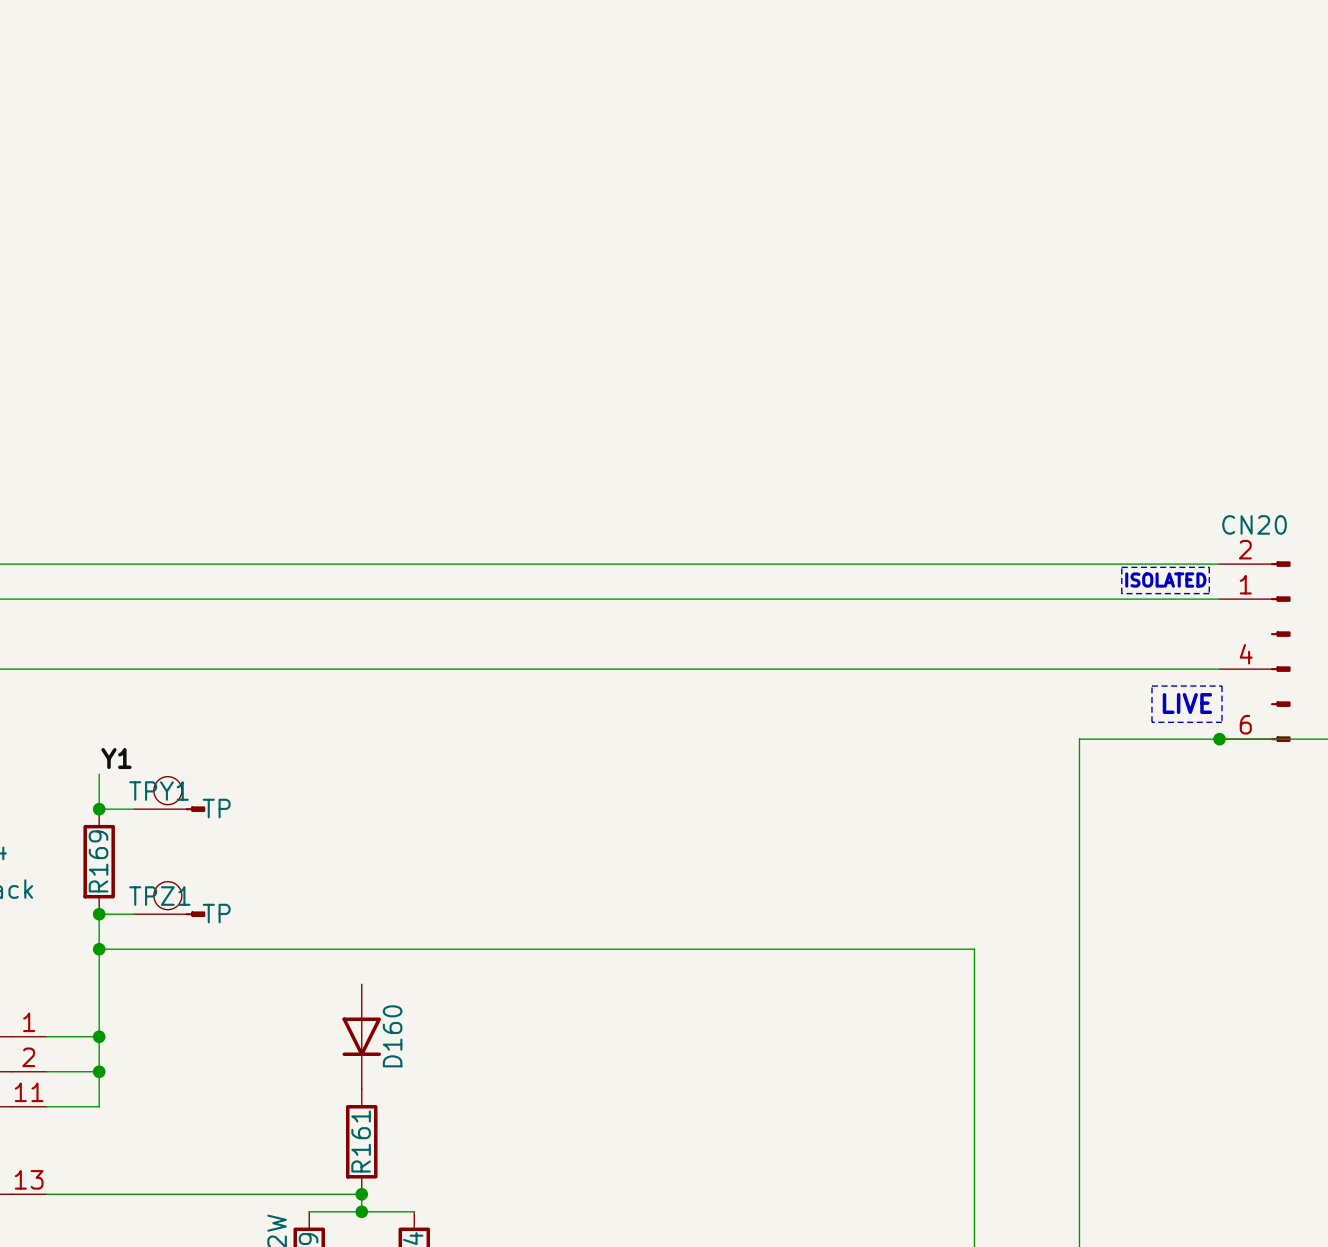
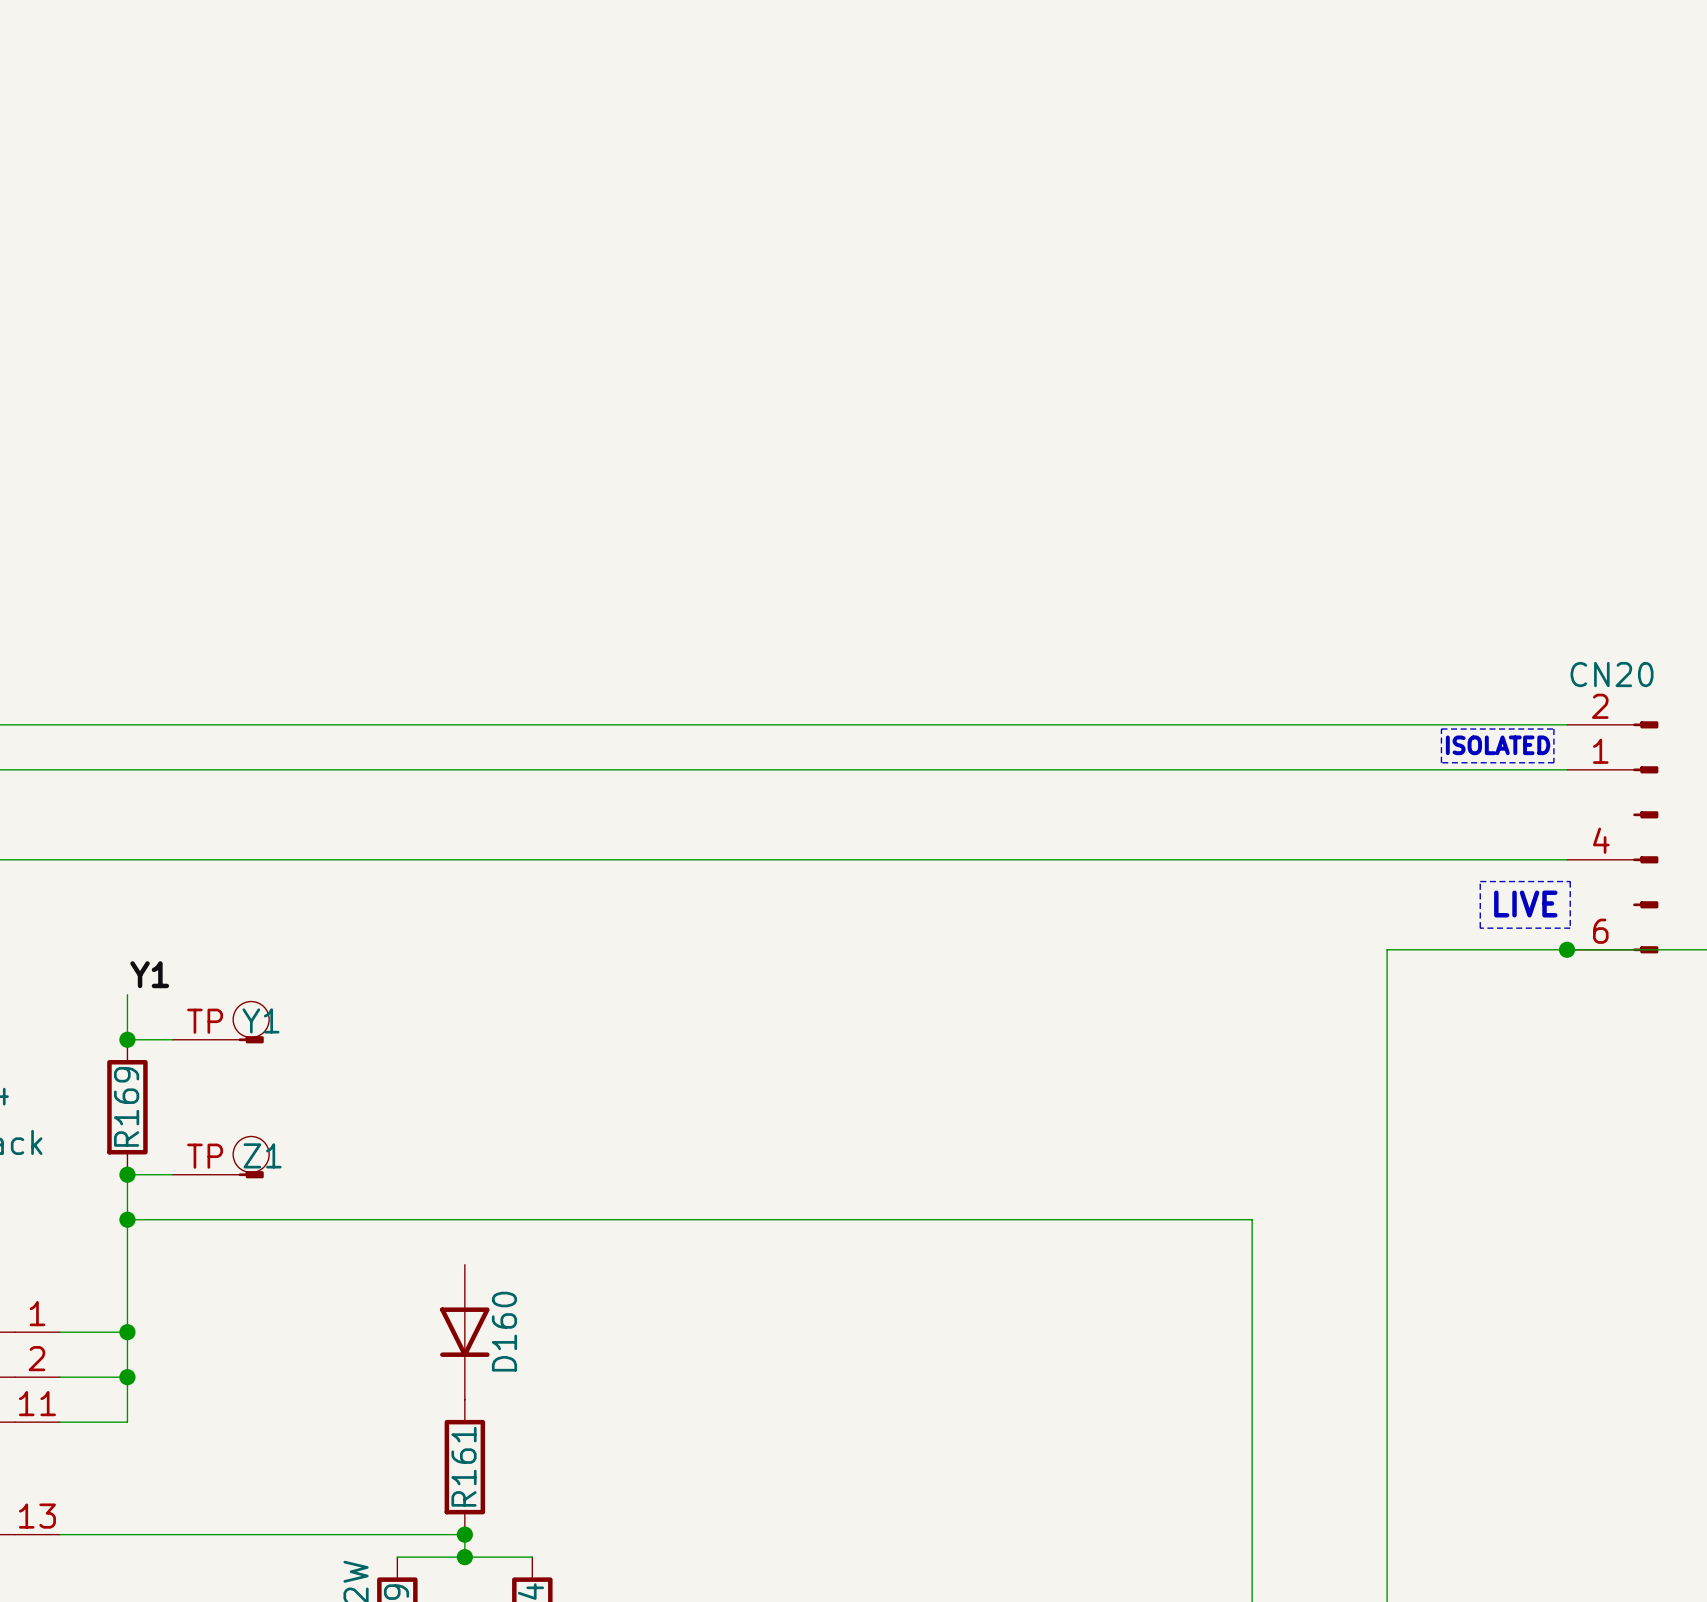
TPY1: (169, 794) -> none
Y1: none -> (220, 1022)
TPZ1: (169, 899) -> none
Z1: none -> (220, 1157)

